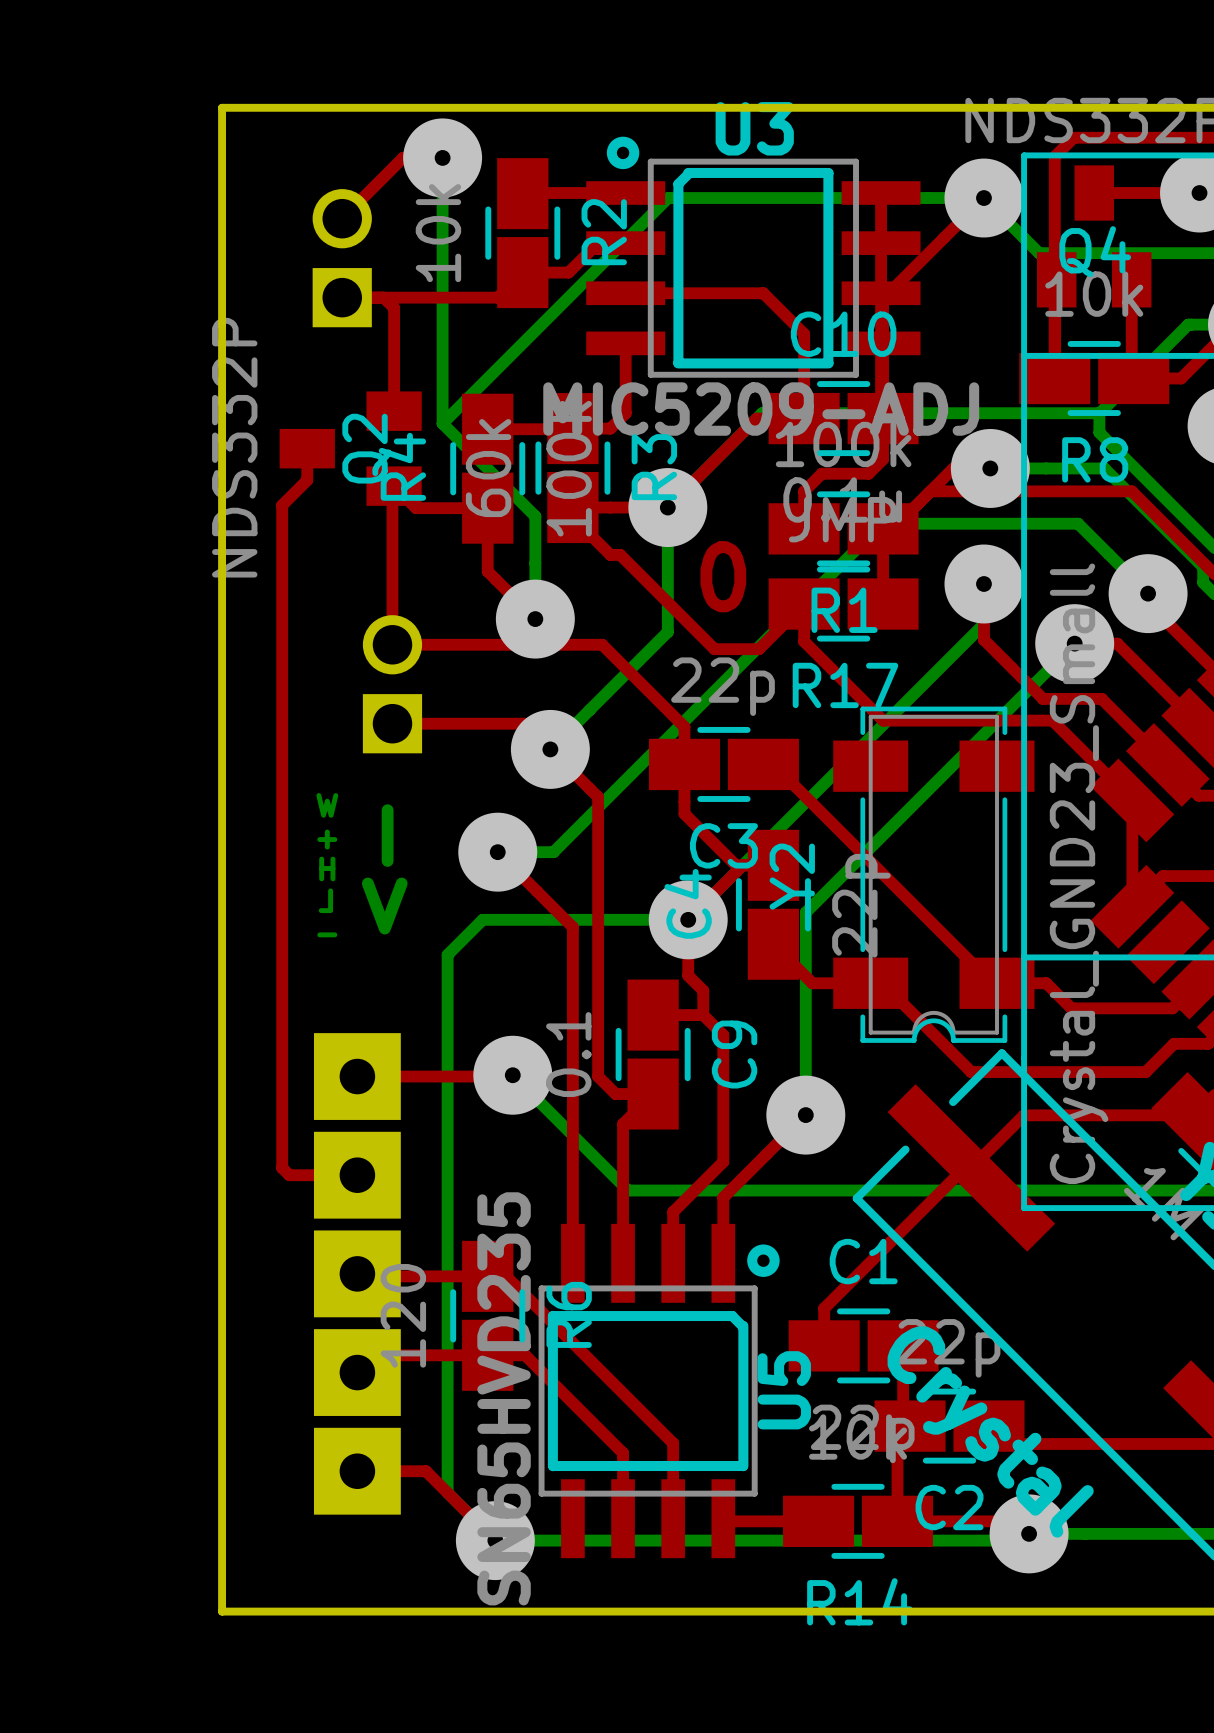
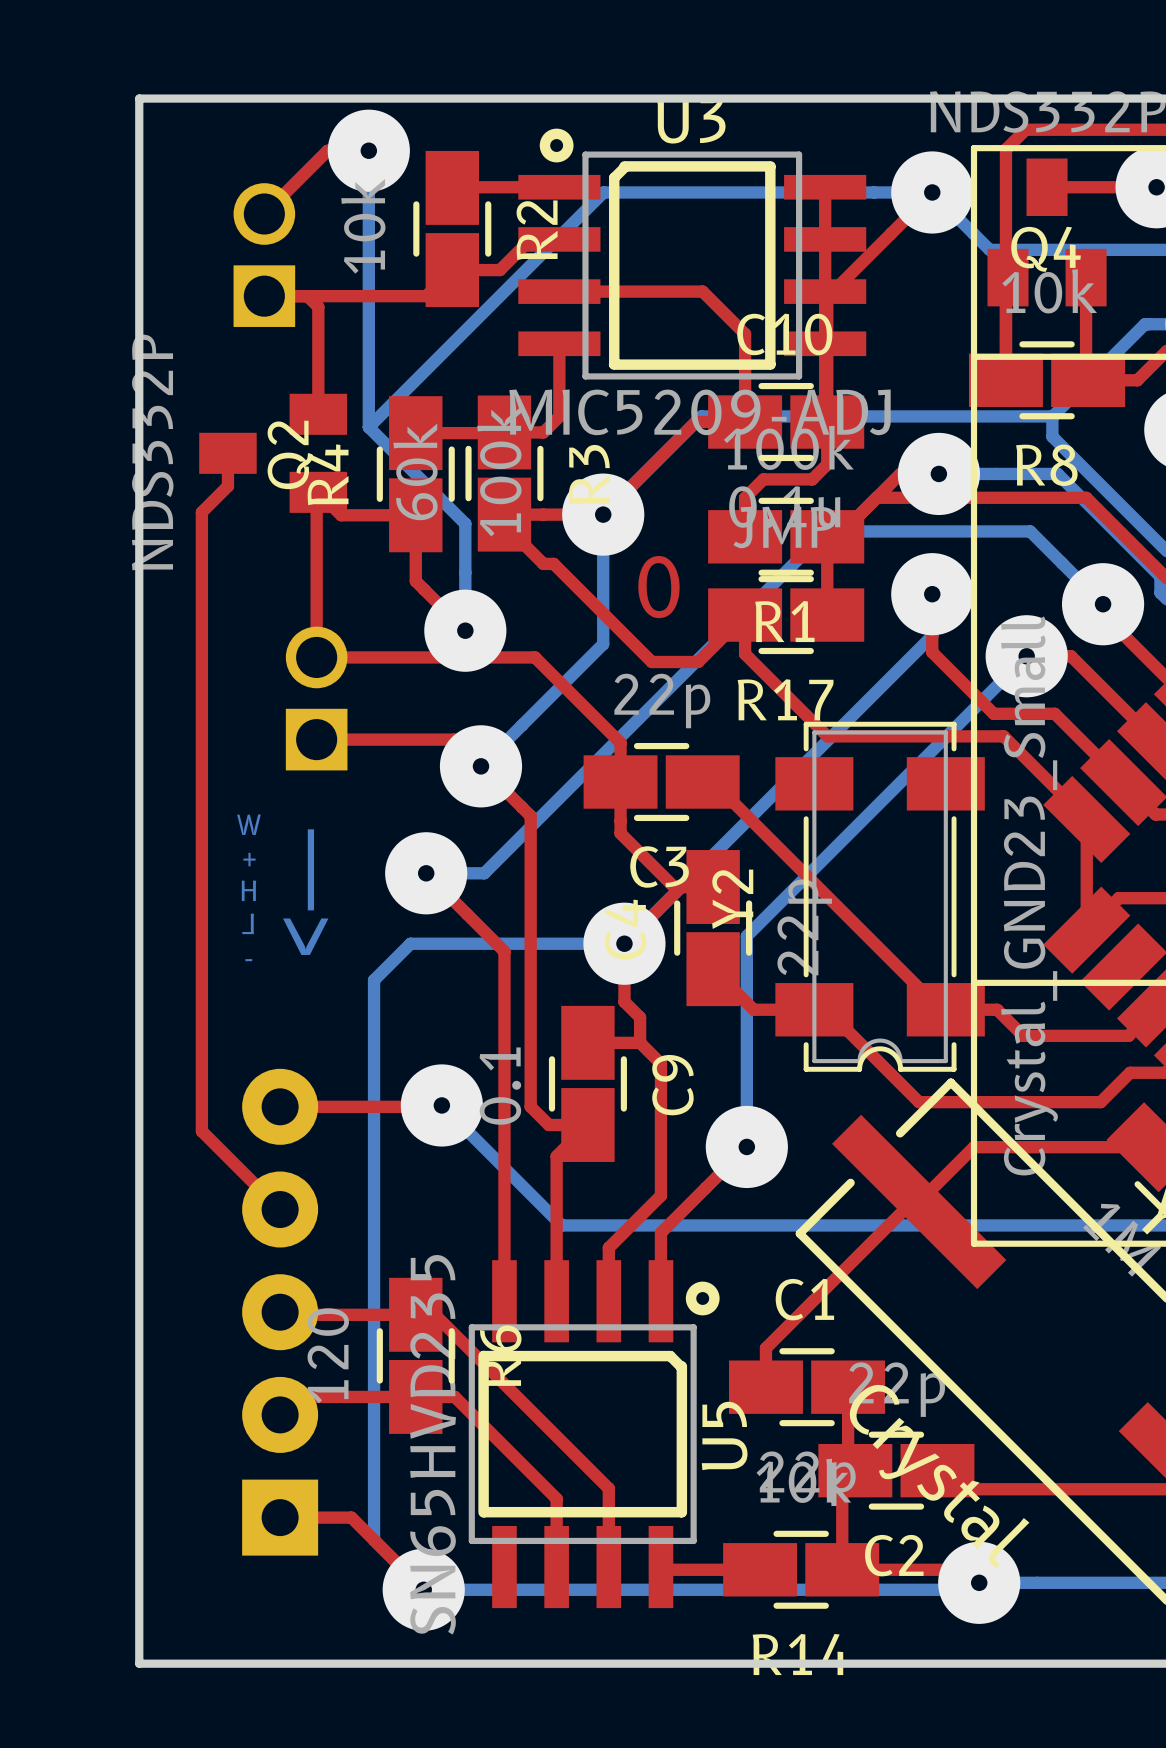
part footprint: [313, 1033, 401, 1515] -> [242, 1068, 319, 1556]
top track: (282, 1100) (282, 1167) (289, 1175) (357, 1175) -> (201, 1131) (280, 1209)

